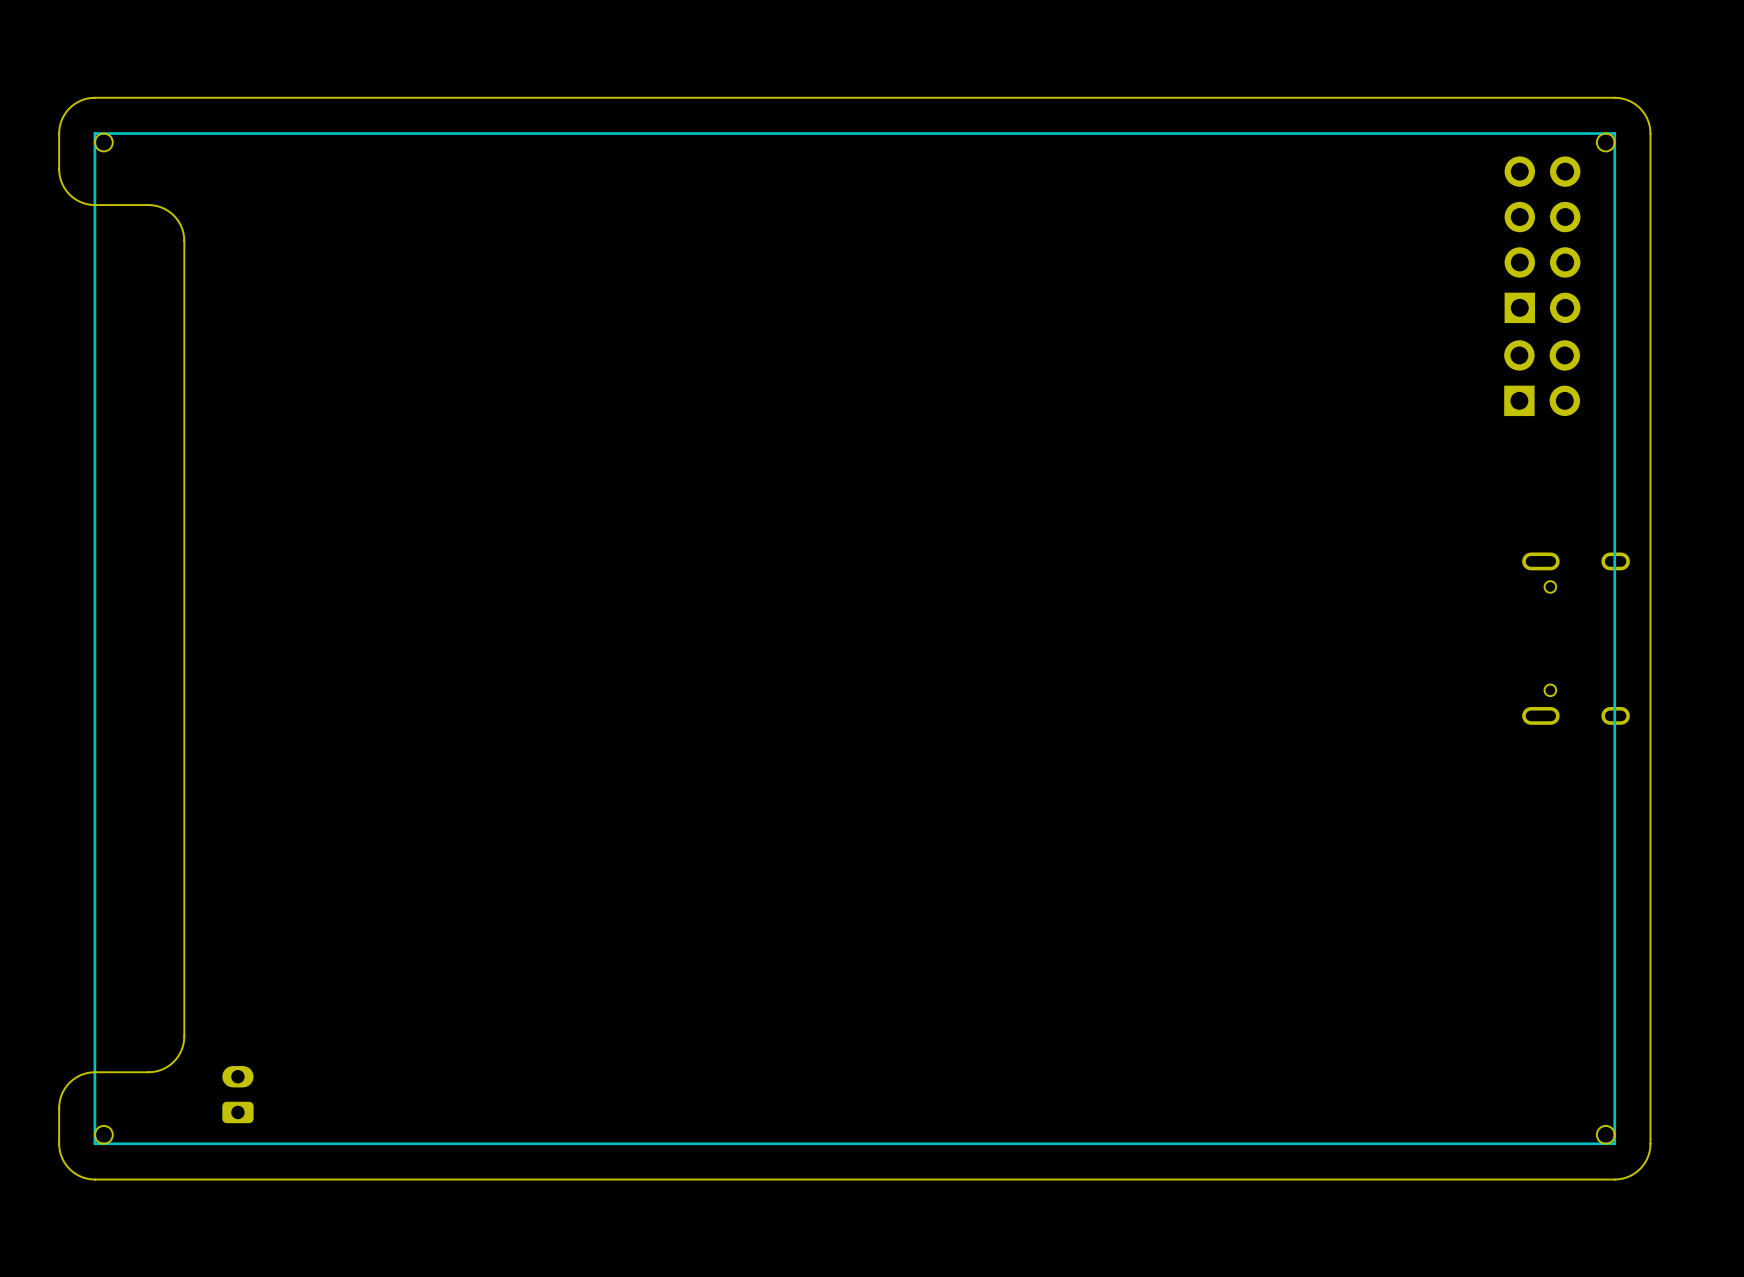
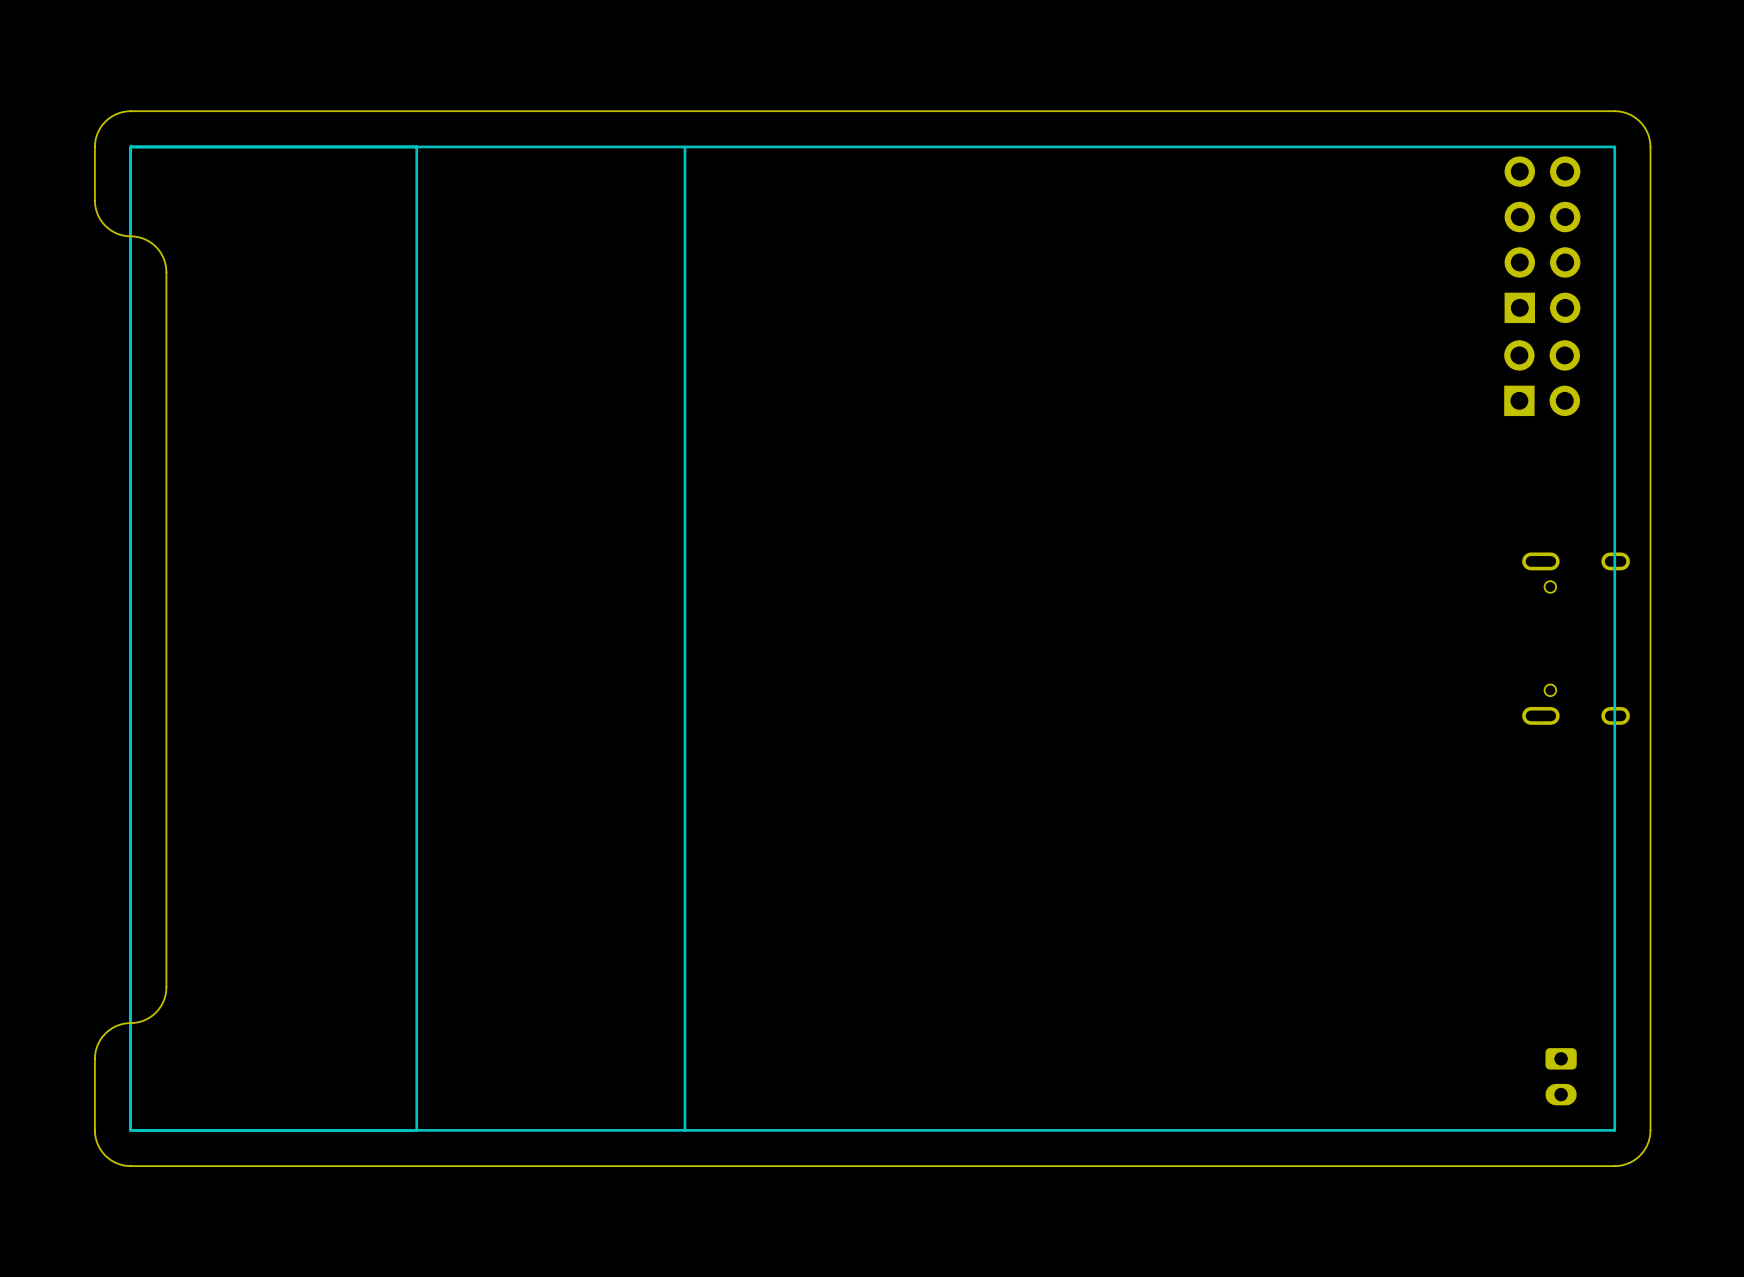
round board edge: [94, 132, 114, 153] -> none
round board edge: [1595, 132, 1616, 153] -> none
line: none -> (416, 146) (416, 1130)
line: none -> (684, 146) (684, 1130)
line: (1614, 146) (1614, 133) (94, 133) (94, 1143) (1614, 1143) (1614, 1130) -> (1614, 146) (130, 146) (130, 1130) (1614, 1130)
board edge: (1650, 146) (1649, 125) (1642, 111) (1630, 101) (1614, 97) (94, 97) (83, 99) (69, 108) (62, 118) (59, 133) (60, 177) (64, 188) (72, 197) (90, 204) (148, 205) (160, 207) (170, 212) (178, 221) (184, 240) (184, 1040) (176, 1058) (160, 1070) (148, 1072) (90, 1072) (75, 1077) (66, 1085) (59, 1104) (59, 1147) (64, 1162) (75, 1174) (94, 1179) (1614, 1179) (1630, 1175) (1642, 1166) (1649, 1151) (1650, 1130) -> (1650, 146) (1648, 135) (1640, 121) (1630, 114) (1614, 111) (130, 111) (115, 114) (105, 121) (98, 131) (94, 146) (95, 204) (100, 219) (115, 232) (142, 238) (152, 244) (162, 256) (166, 272) (166, 991) (162, 1002) (152, 1015) (142, 1021) (122, 1023) (111, 1028) (102, 1036) (96, 1047) (94, 1058) (95, 1134) (100, 1149) (111, 1160) (130, 1166) (1614, 1166) (1626, 1164) (1640, 1155) (1648, 1142) (1650, 1130)
part: none -> (1561, 1076)
part: (237, 1094) -> none
round board edge: [94, 1125, 114, 1145] -> none
round board edge: [1595, 1125, 1616, 1145] -> none

